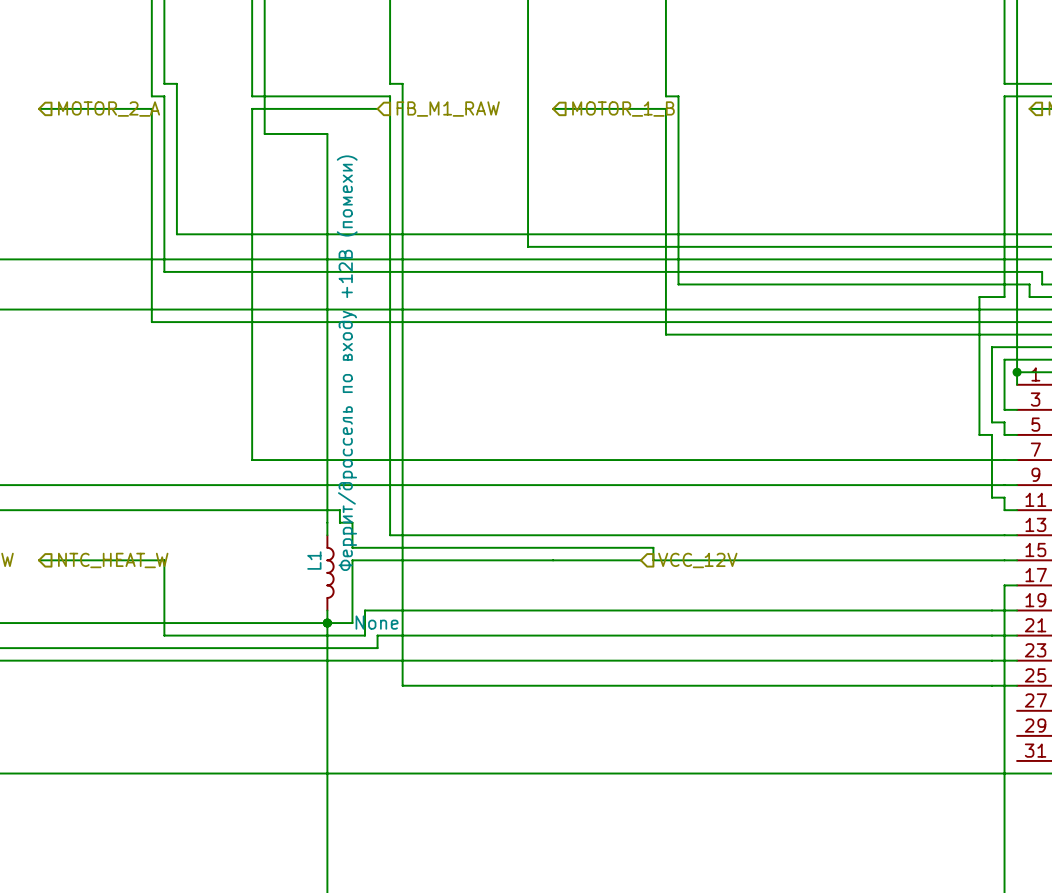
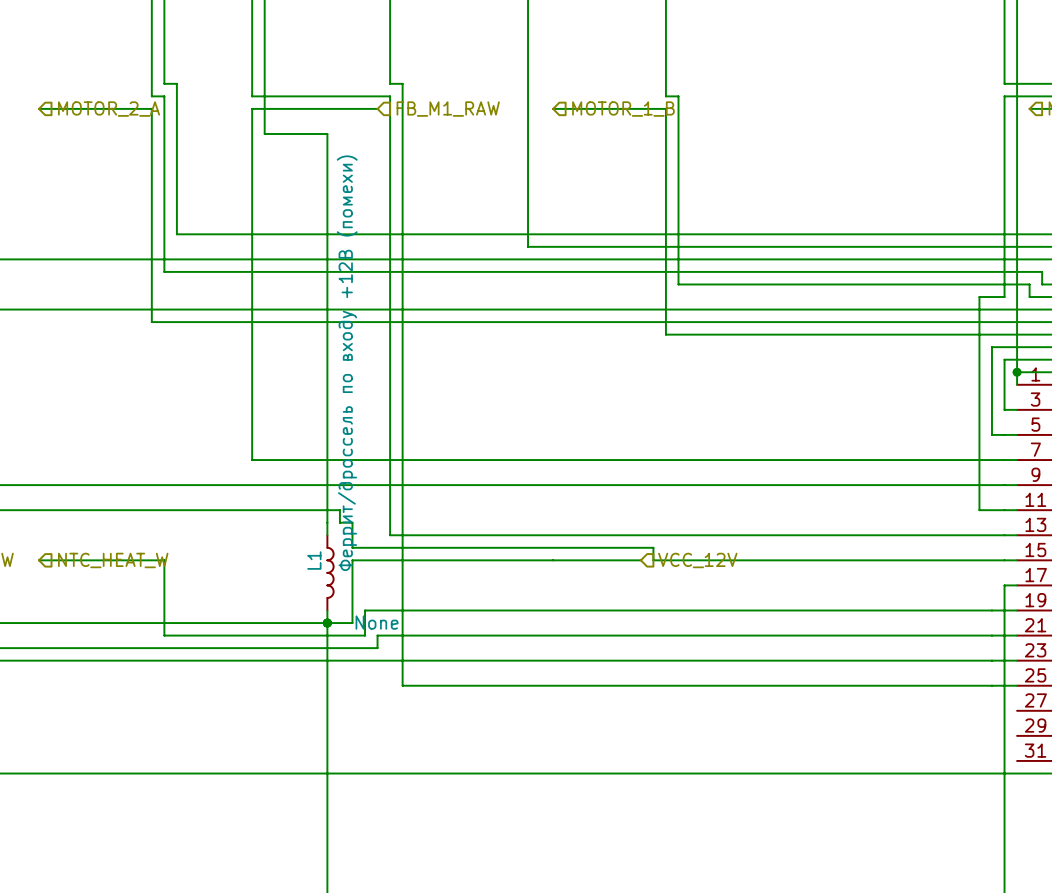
wire: (991, 422) (1004, 422) (1004, 434) -> (991, 422) (991, 434) (1004, 434)
wire: (979, 434) (991, 434) (991, 497) (1004, 497) (1004, 510) -> (979, 434) (979, 510) (1004, 510)

